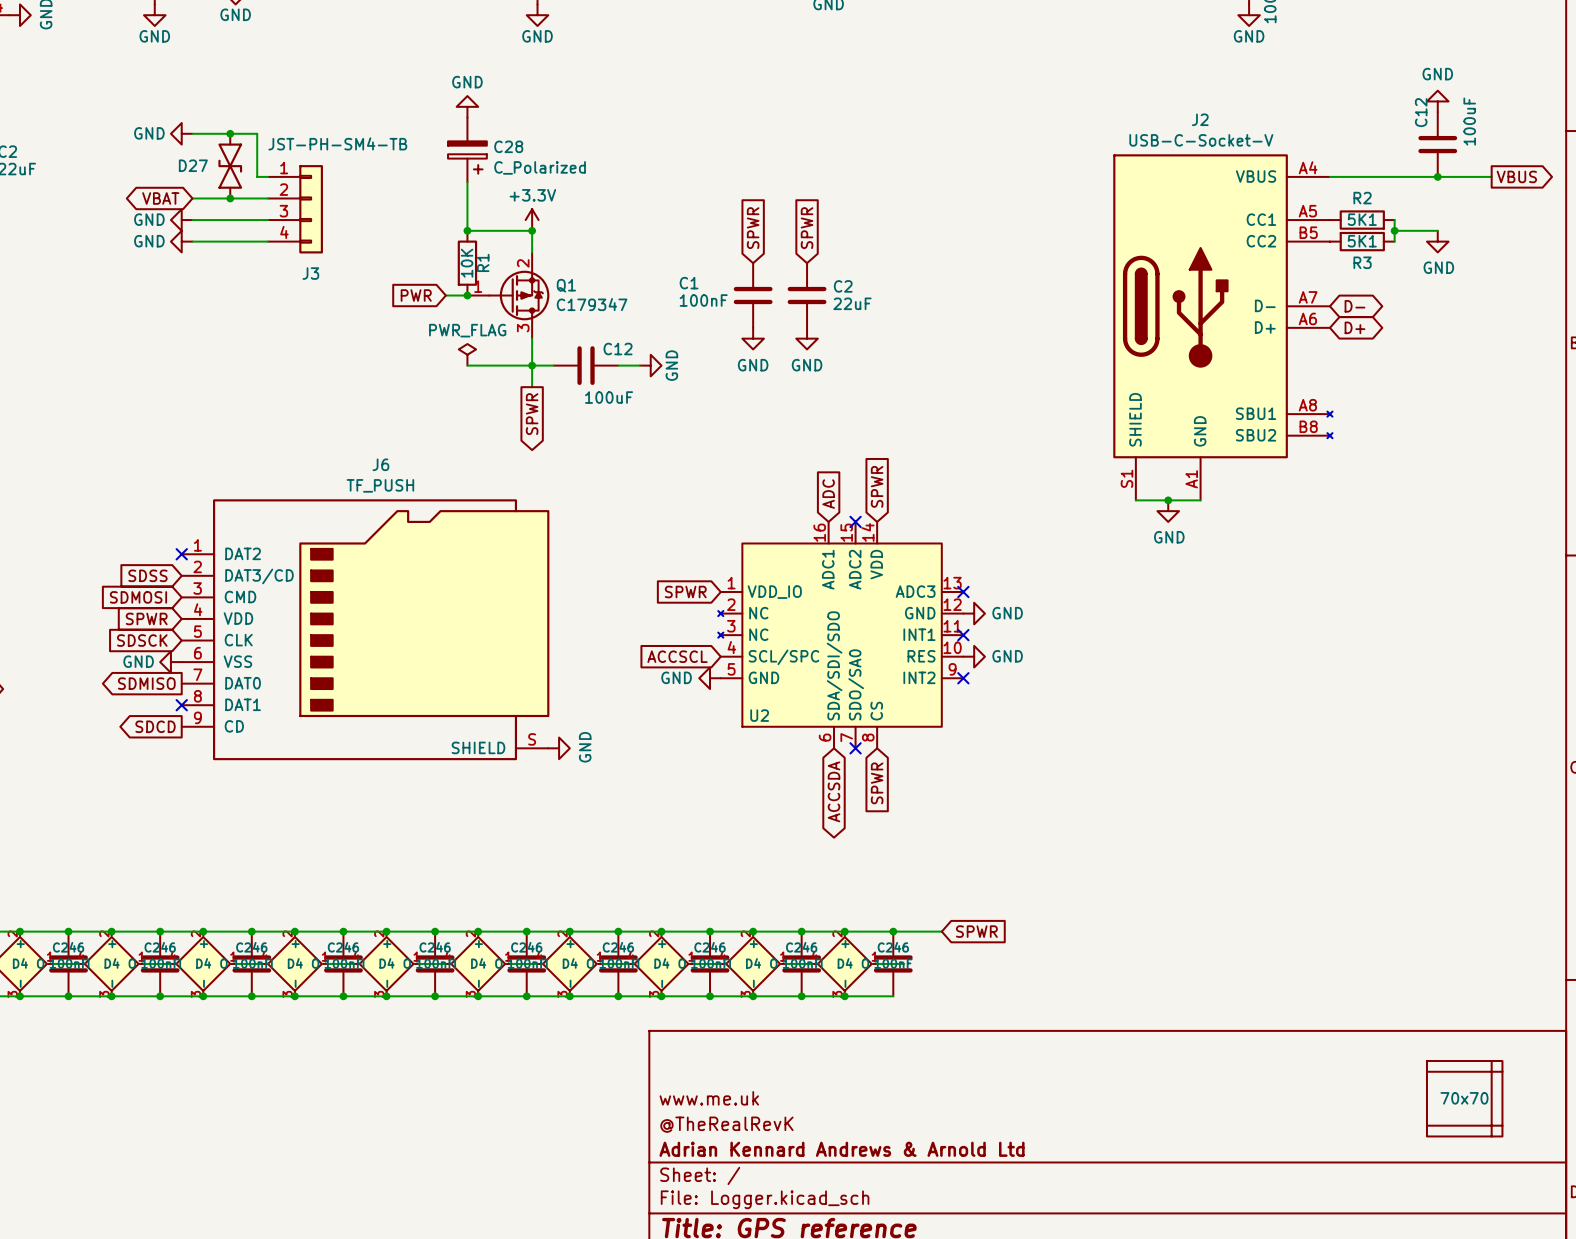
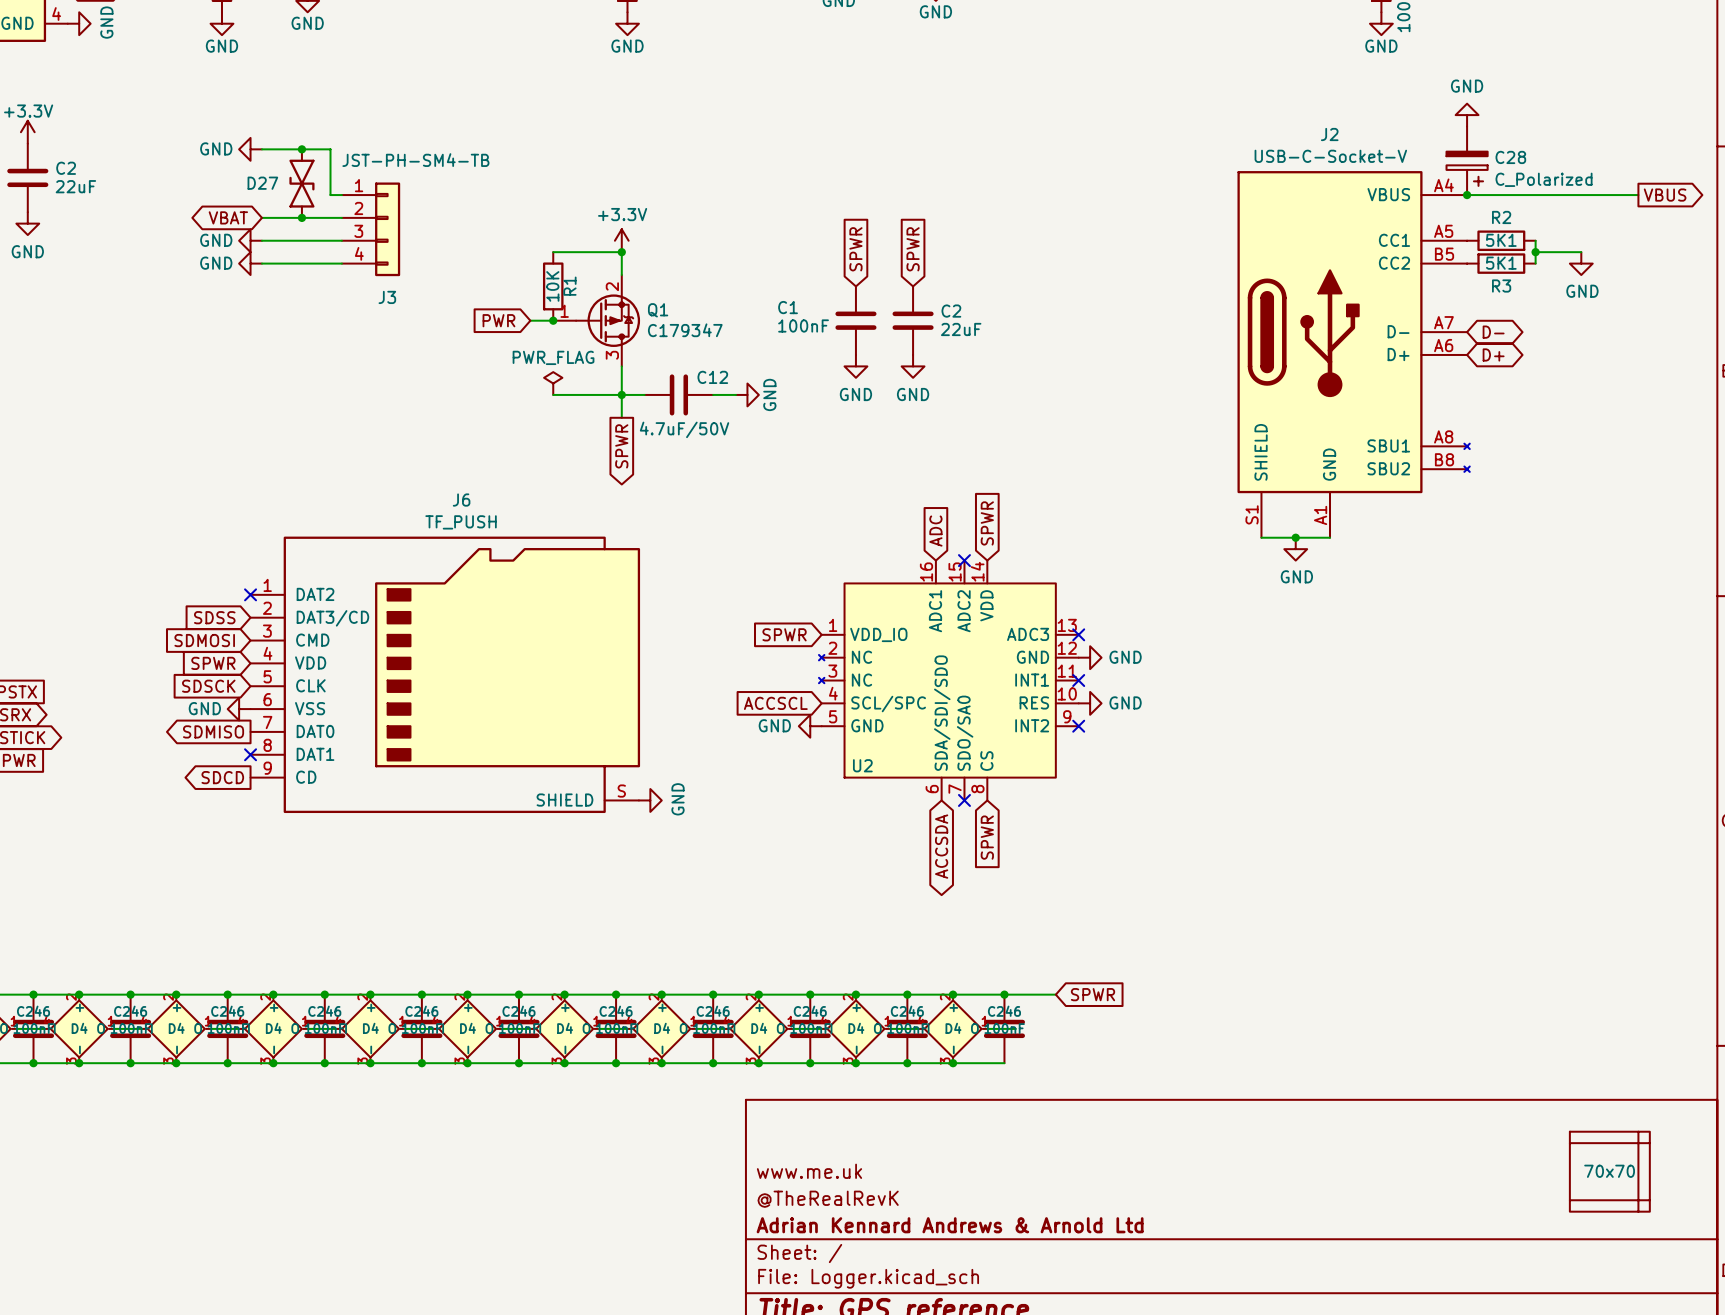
power symbol position: GND (1437, 101) -> GND (1467, 115)
power symbol: GND (467, 106) -> none
C12: 100uF (1437, 144) -> none
C28 position: (467, 149) -> (1467, 160)
junction: none -> (1467, 195)
junction: (1437, 176) -> none
wire: (467, 182) (467, 230) -> none
junction: (467, 230) -> none
C12 value: 100uF (609, 397) -> 4.7uF/50V (684, 429)

